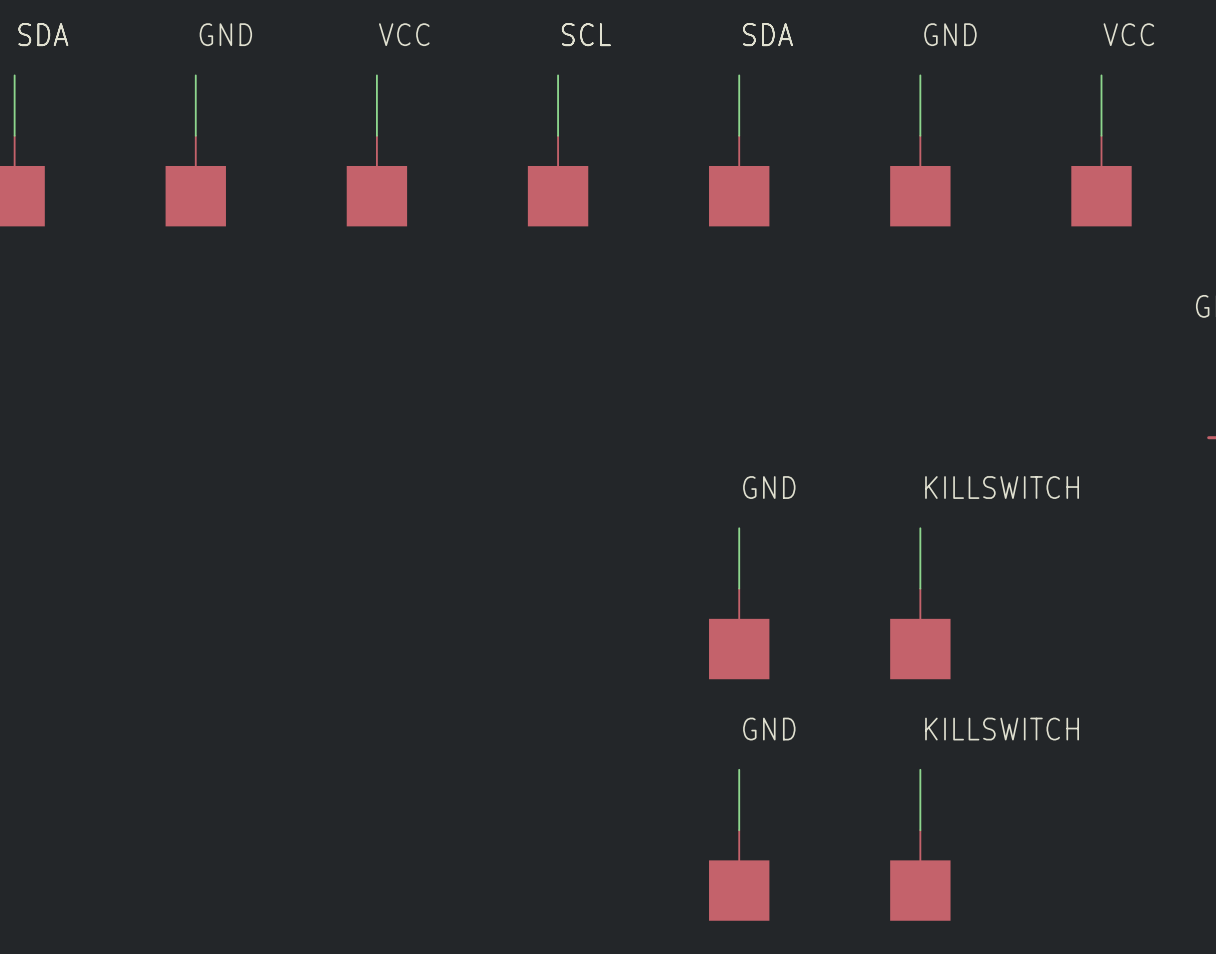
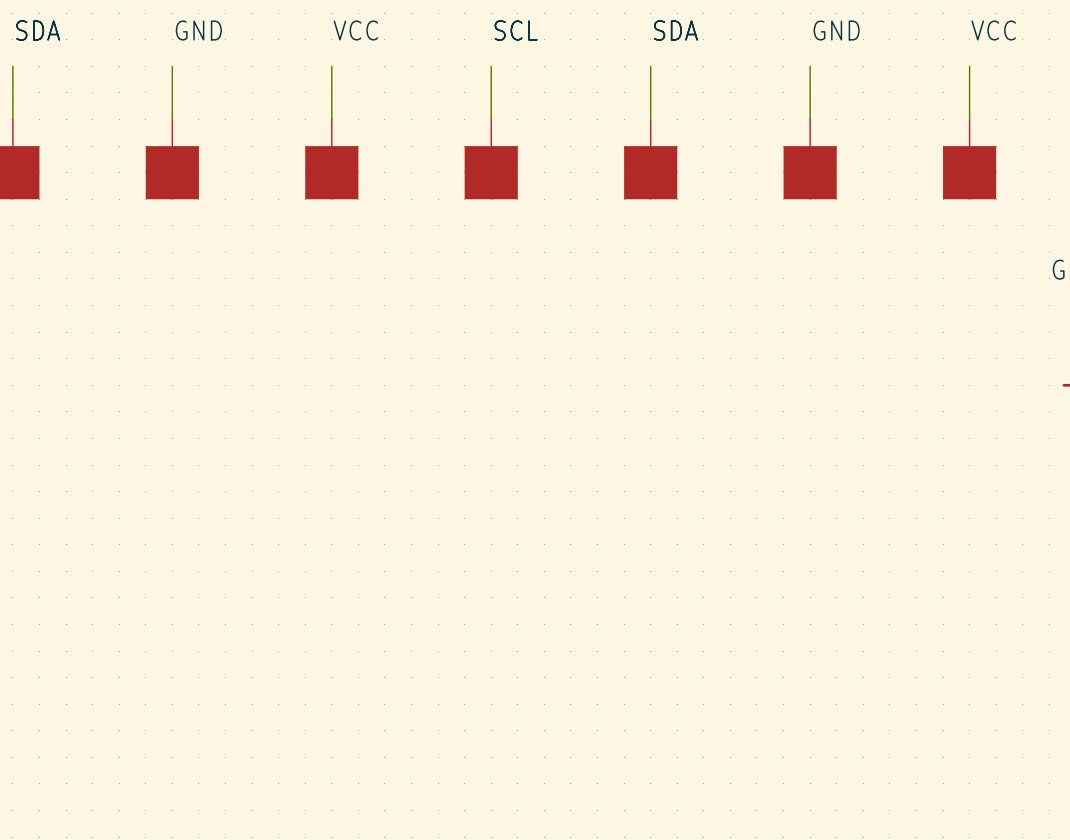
label: GND (769, 487) -> none
label: KILLSWITCH (1002, 487) -> none
wire: (739, 528) (739, 588) -> none
wire: (920, 528) (920, 588) -> none
part: (739, 633) -> none
part: (920, 633) -> none
label: GND (769, 729) -> none
label: KILLSWITCH (1002, 729) -> none
wire: (739, 769) (739, 830) -> none
wire: (920, 769) (920, 830) -> none
part: (739, 875) -> none
part: (920, 875) -> none

